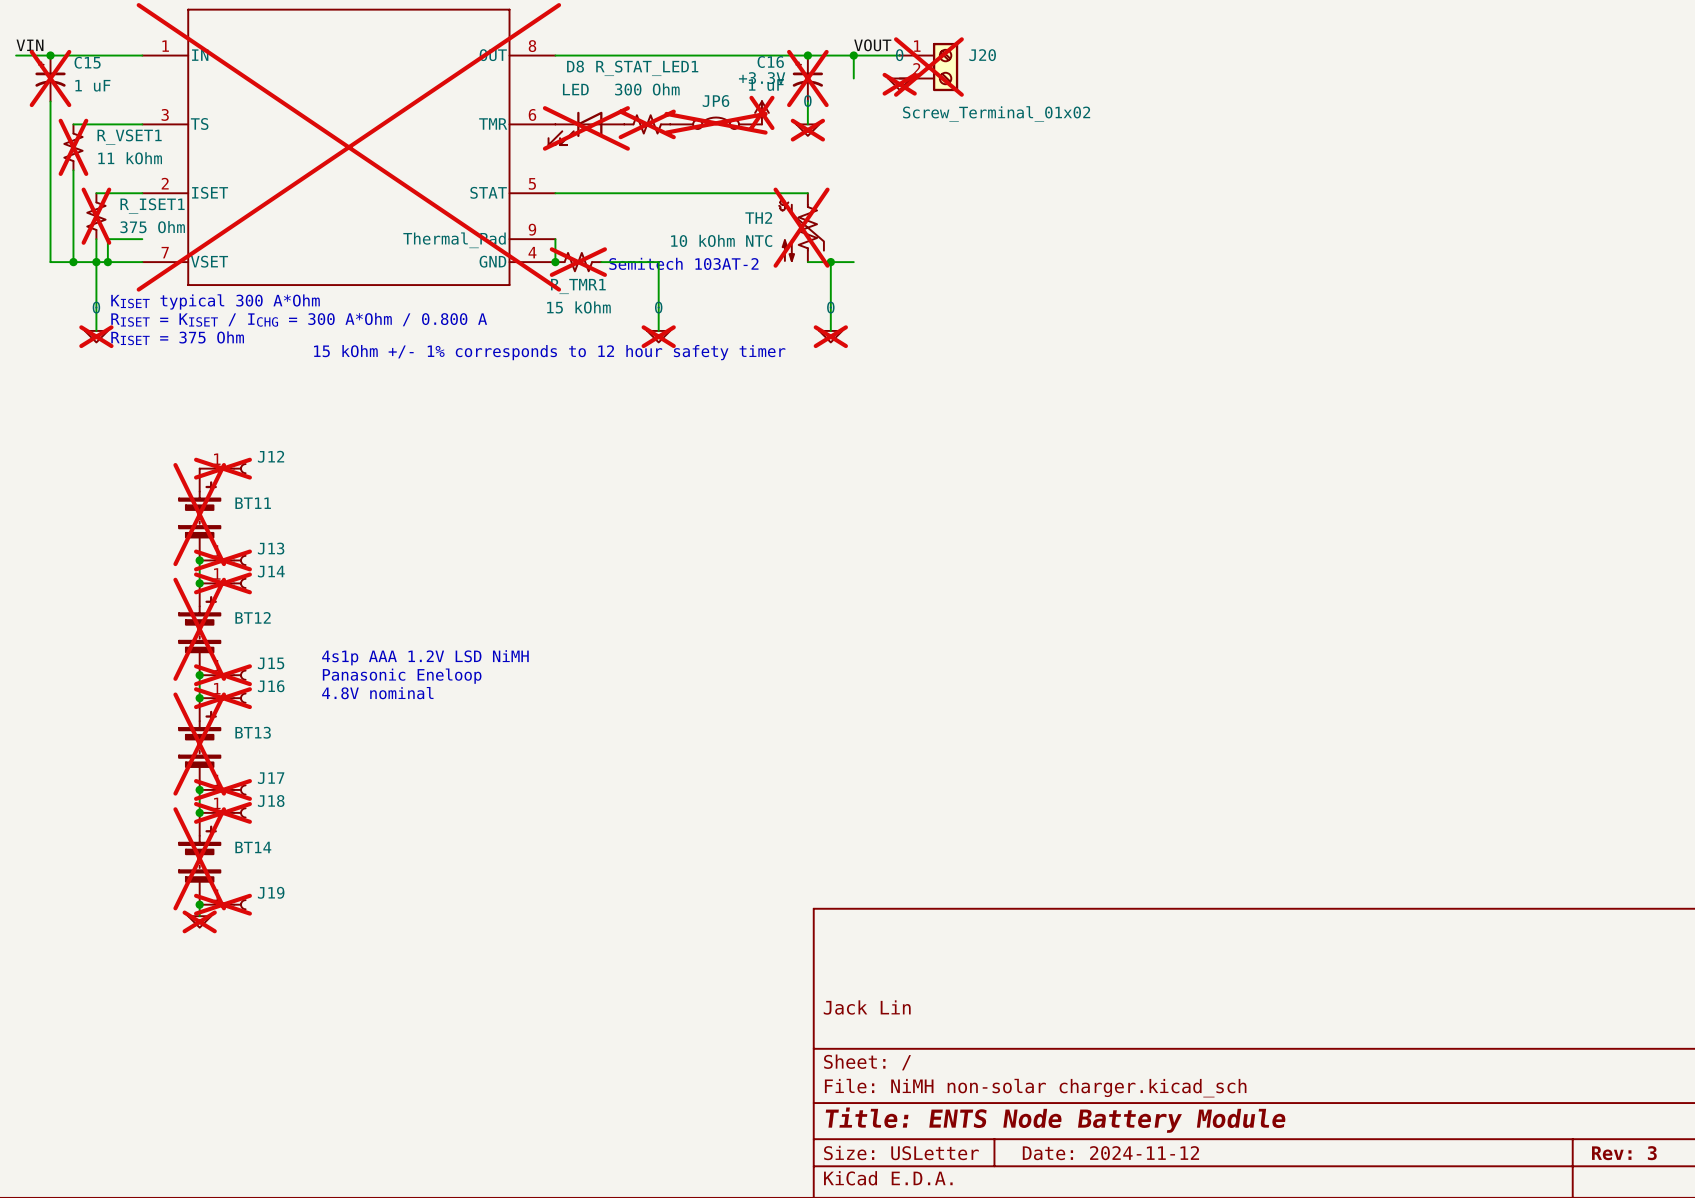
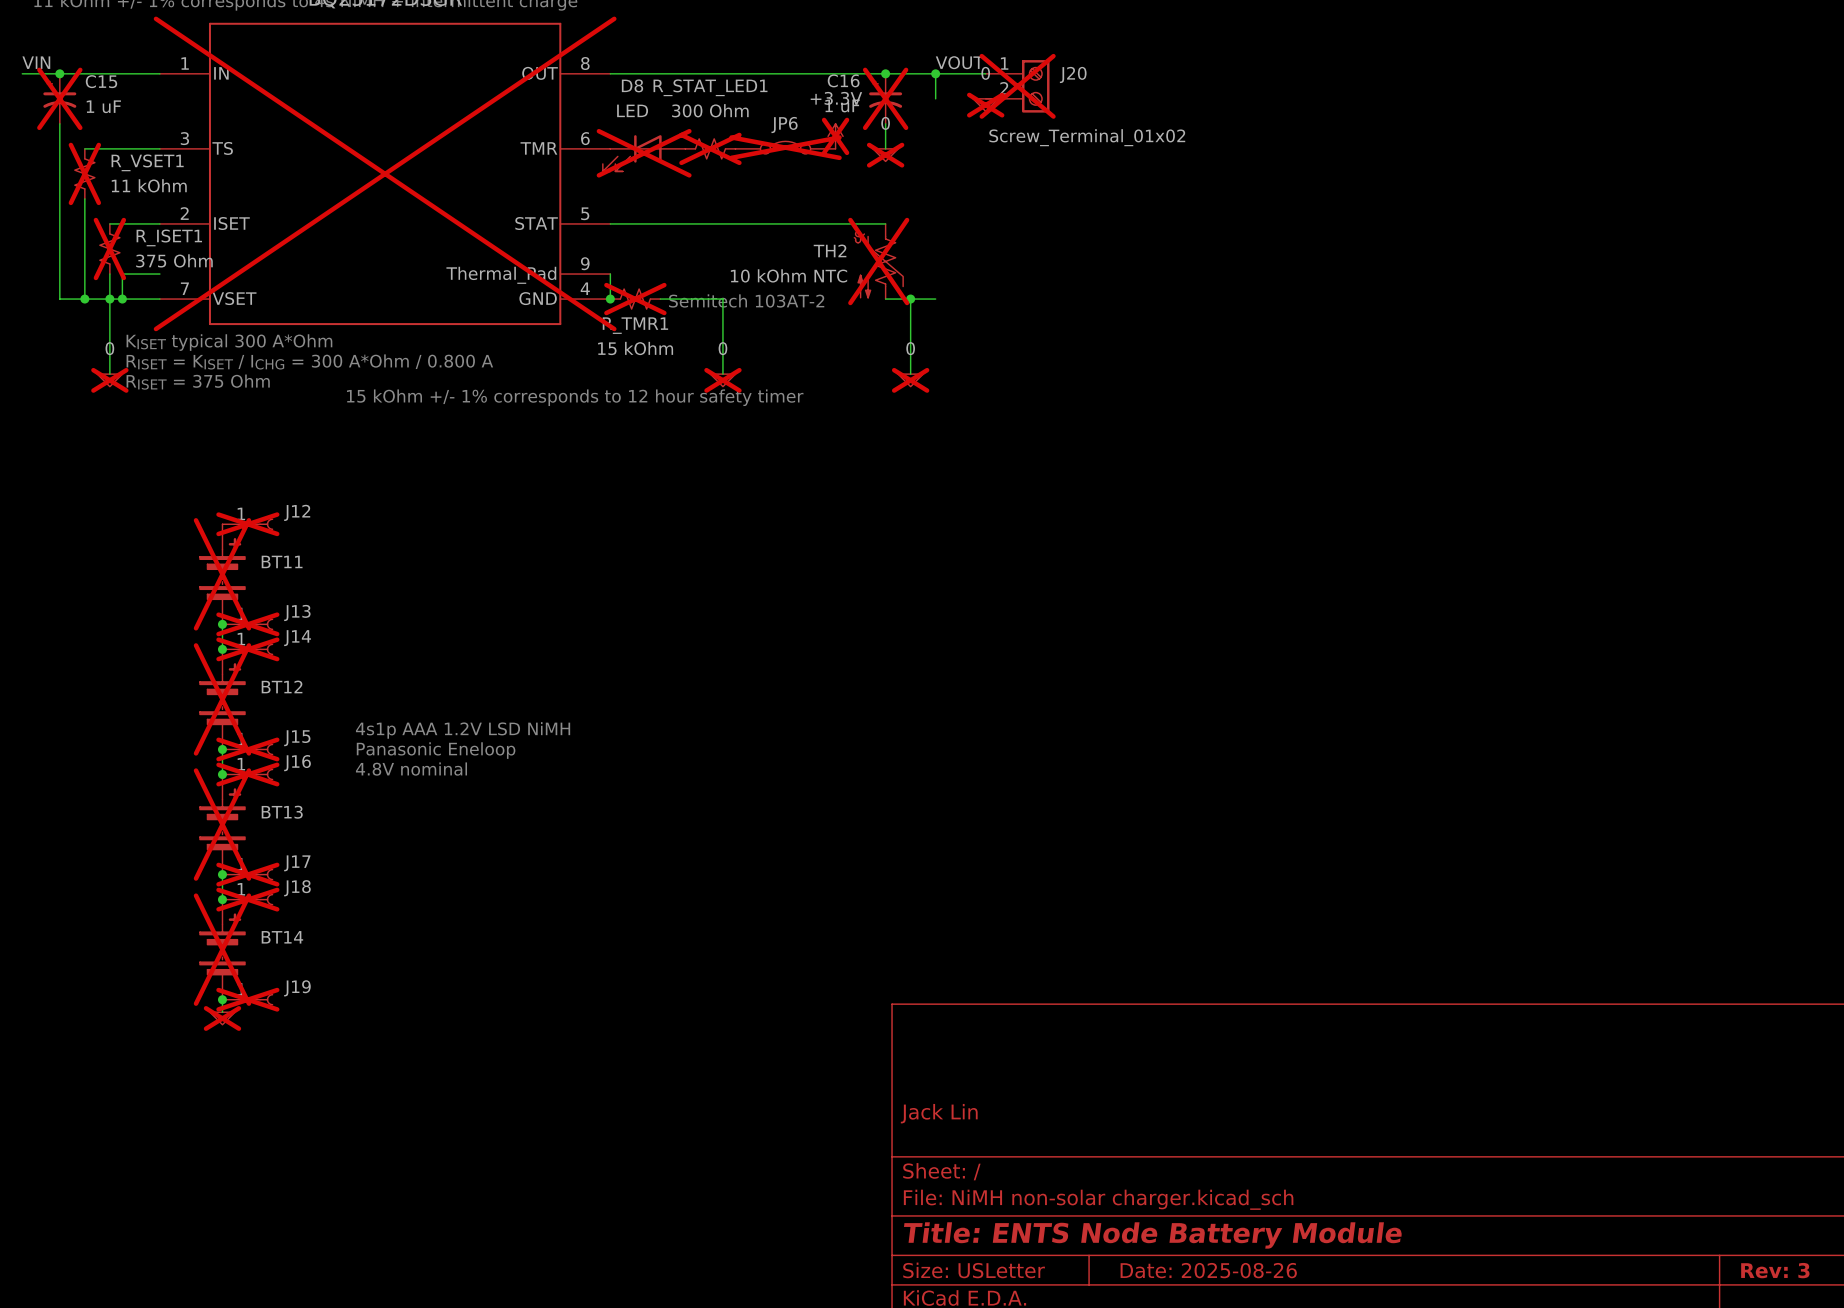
title block: Date: 2024-11-12 (1110, 1153) -> Date: 2025-08-26 (1208, 1270)

